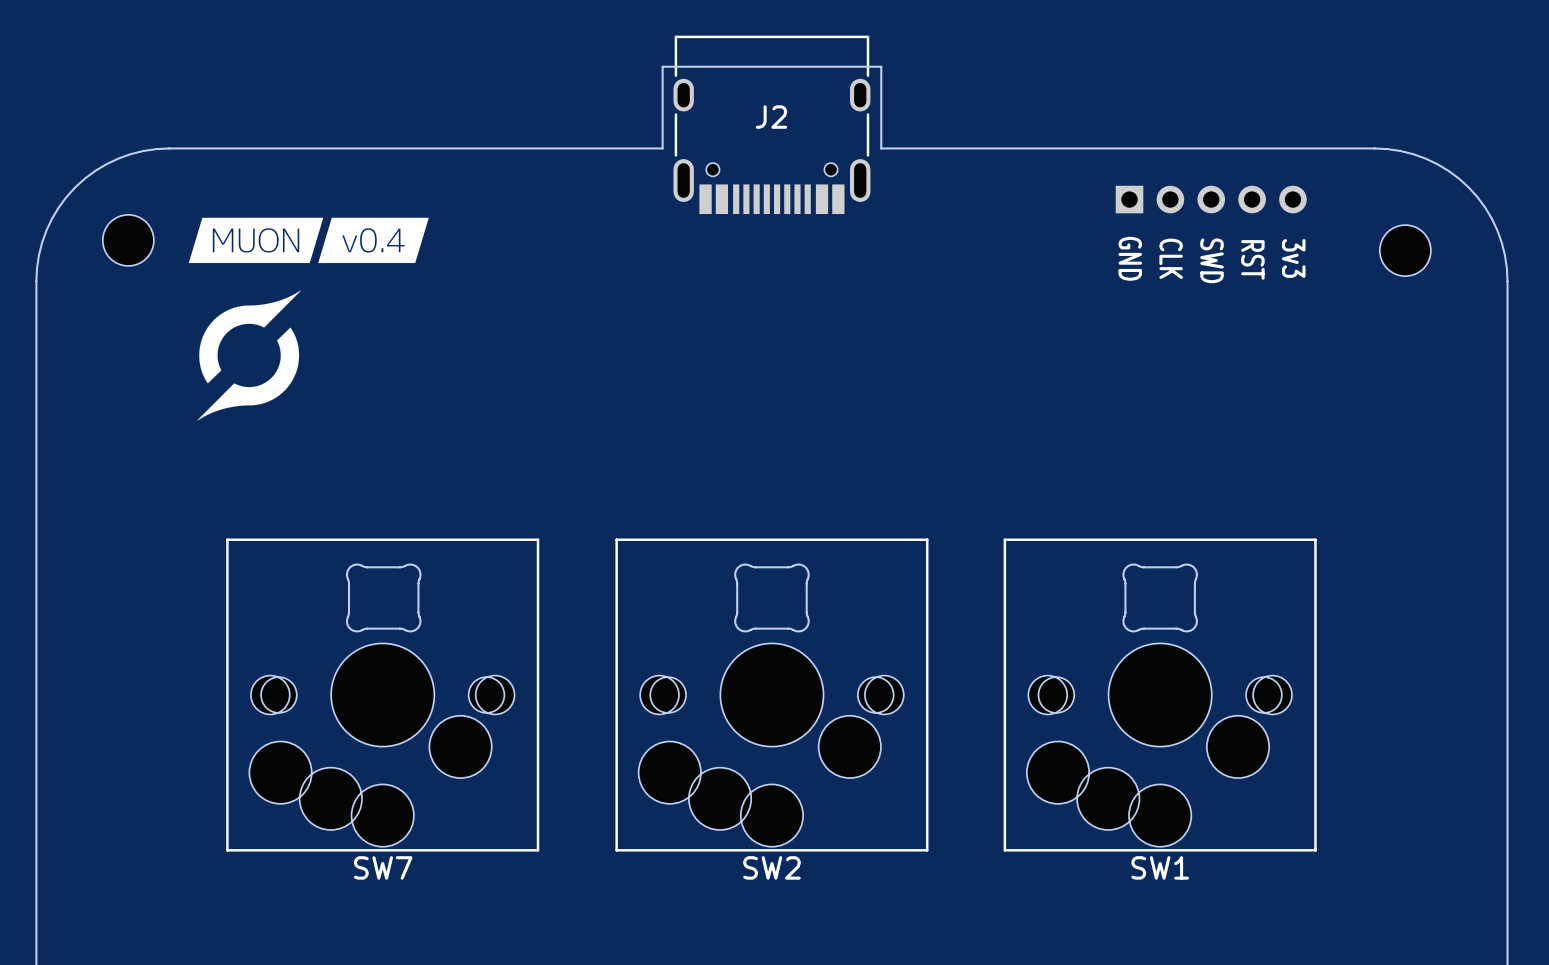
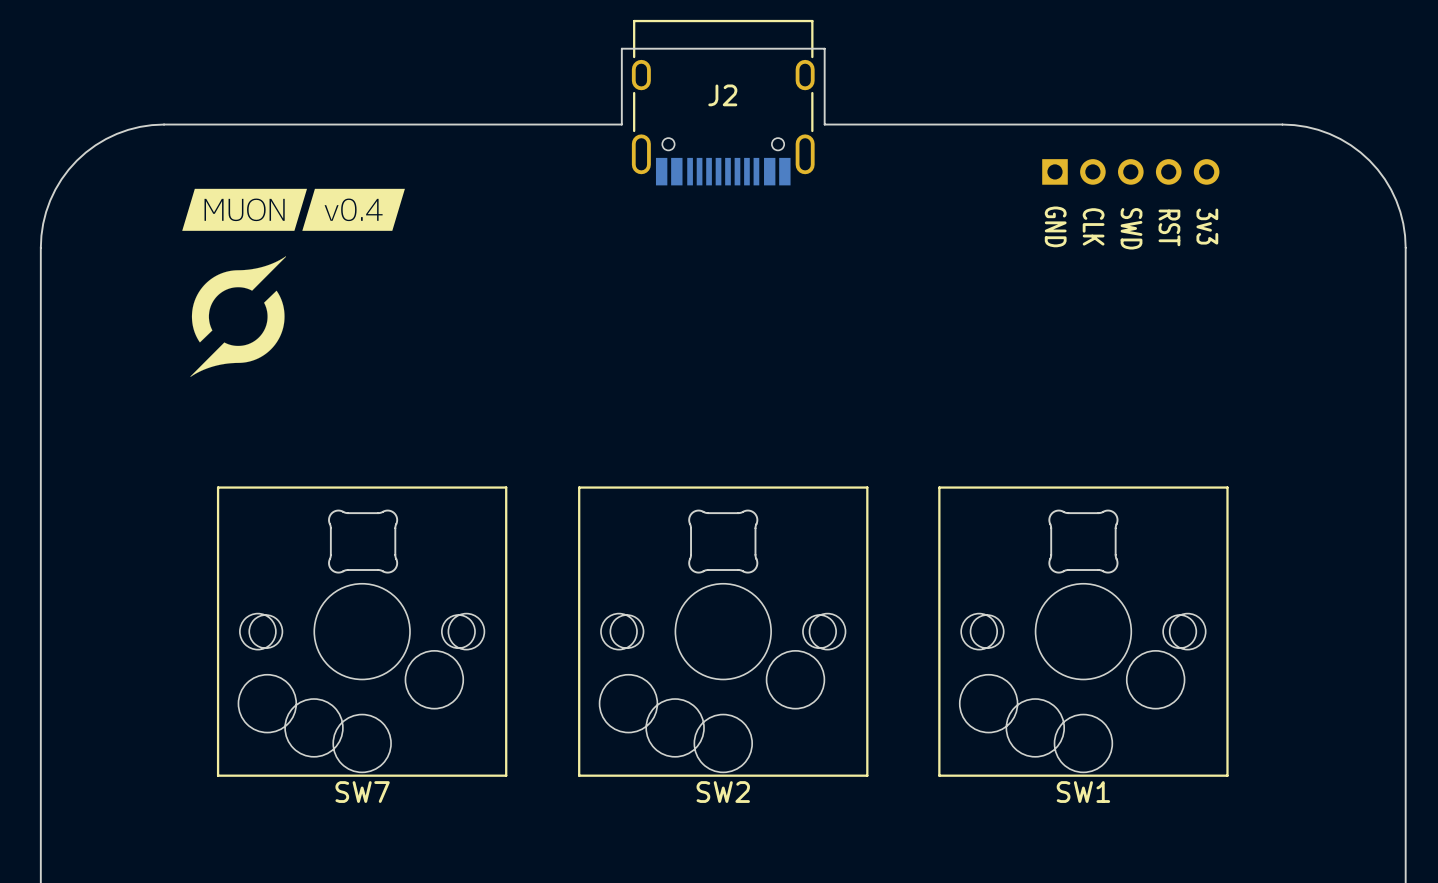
part: (128, 240) -> none
part: (1405, 250) -> none

